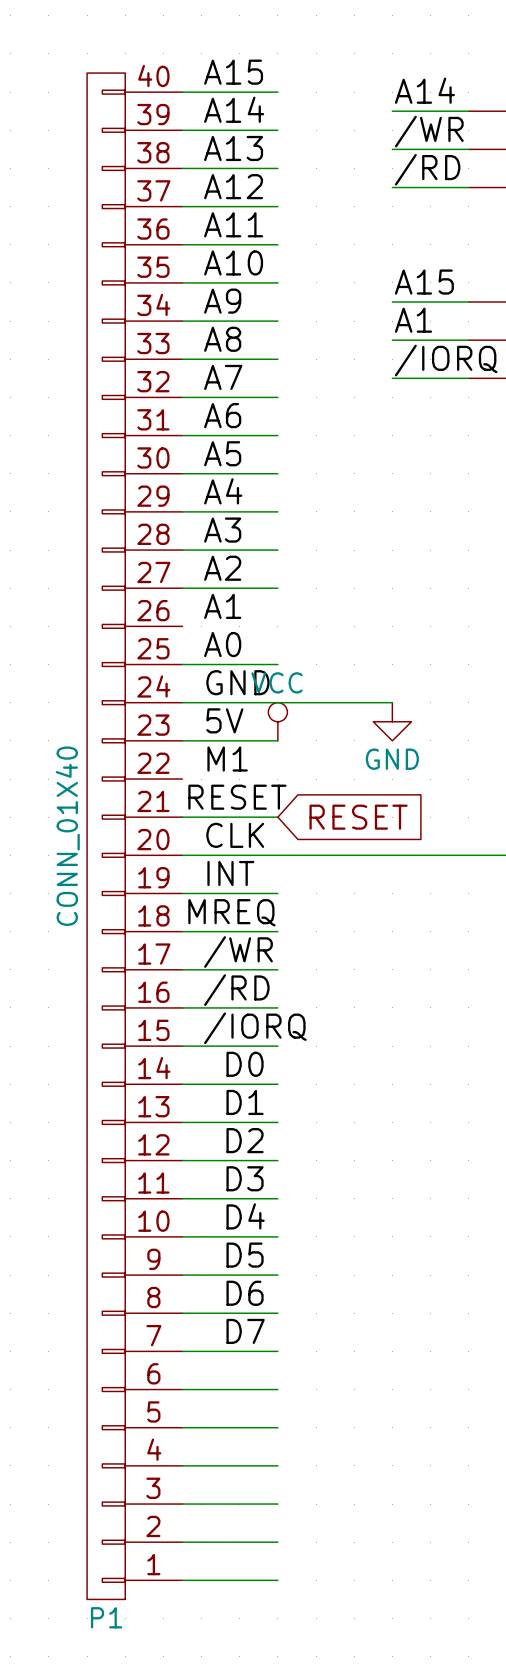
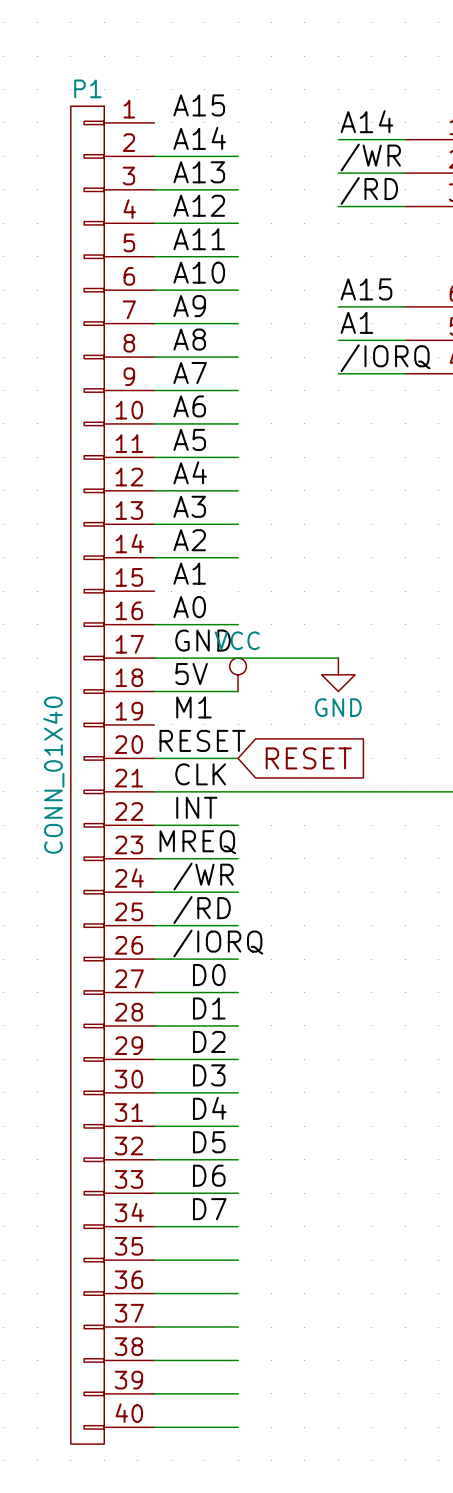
wire: (182, 92) (277, 92) -> none
P1 flip: as is (106, 836) -> up-down (87, 775)

